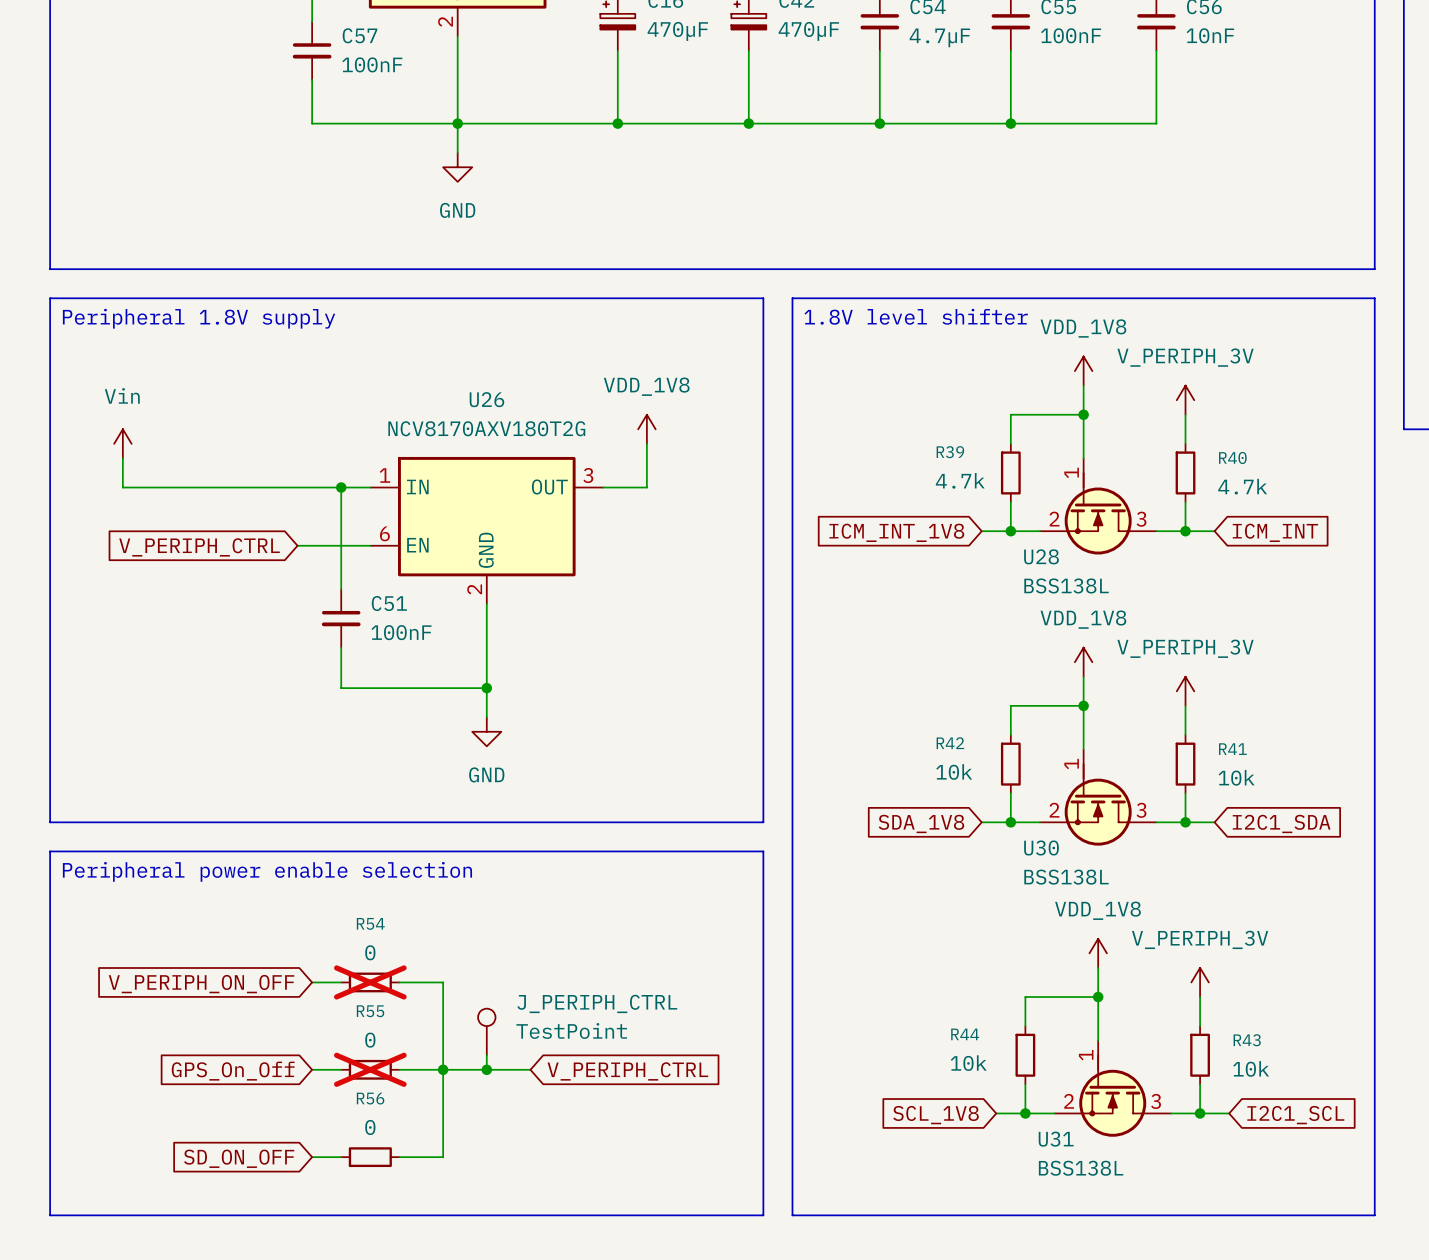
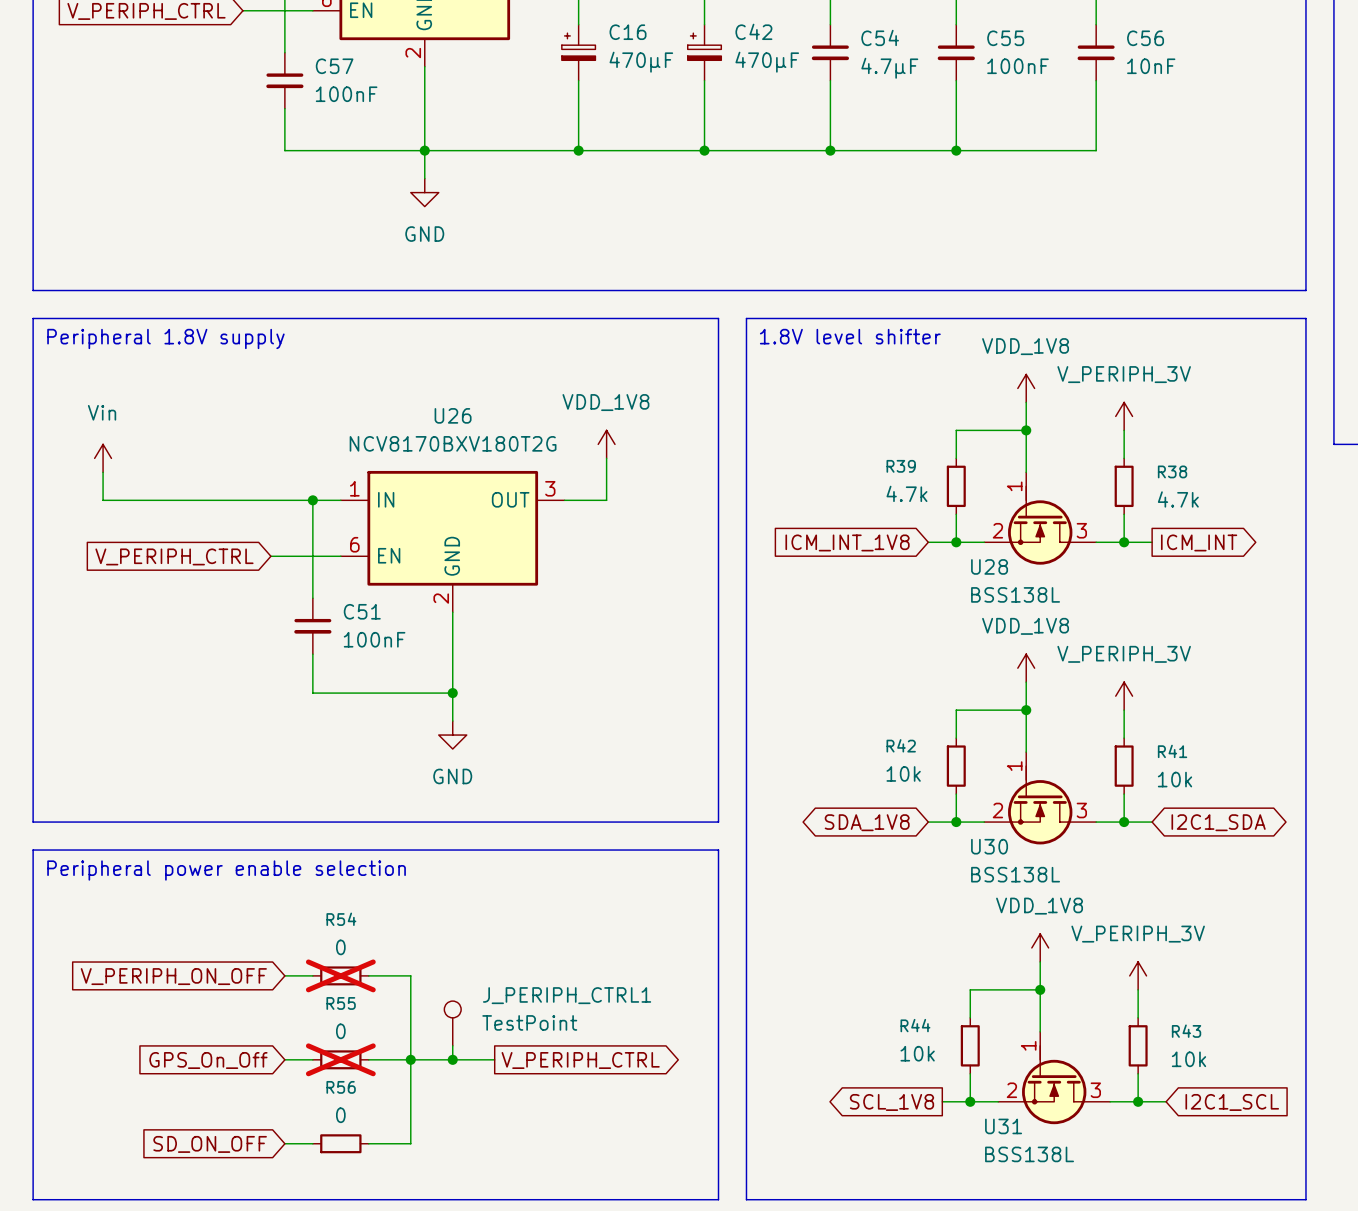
U26 value: NCV8170AXV180T2G (486, 428) -> NCV8170BXV180T2G (453, 443)
R40 name: R40 (1232, 457) -> R38 (1172, 471)
global label shape: input (1275, 532) -> output (1199, 542)
global label shape: input (921, 823) -> bidirectional (867, 822)
global label shape: input (1281, 823) -> bidirectional (1218, 822)
J_PERIPH_CTRL name: J_PERIPH_CTRL (597, 1003) -> J_PERIPH_CTRL1 (567, 995)
global label shape: input (627, 1071) -> output (580, 1060)
global label shape: input (936, 1115) -> output (891, 1102)

